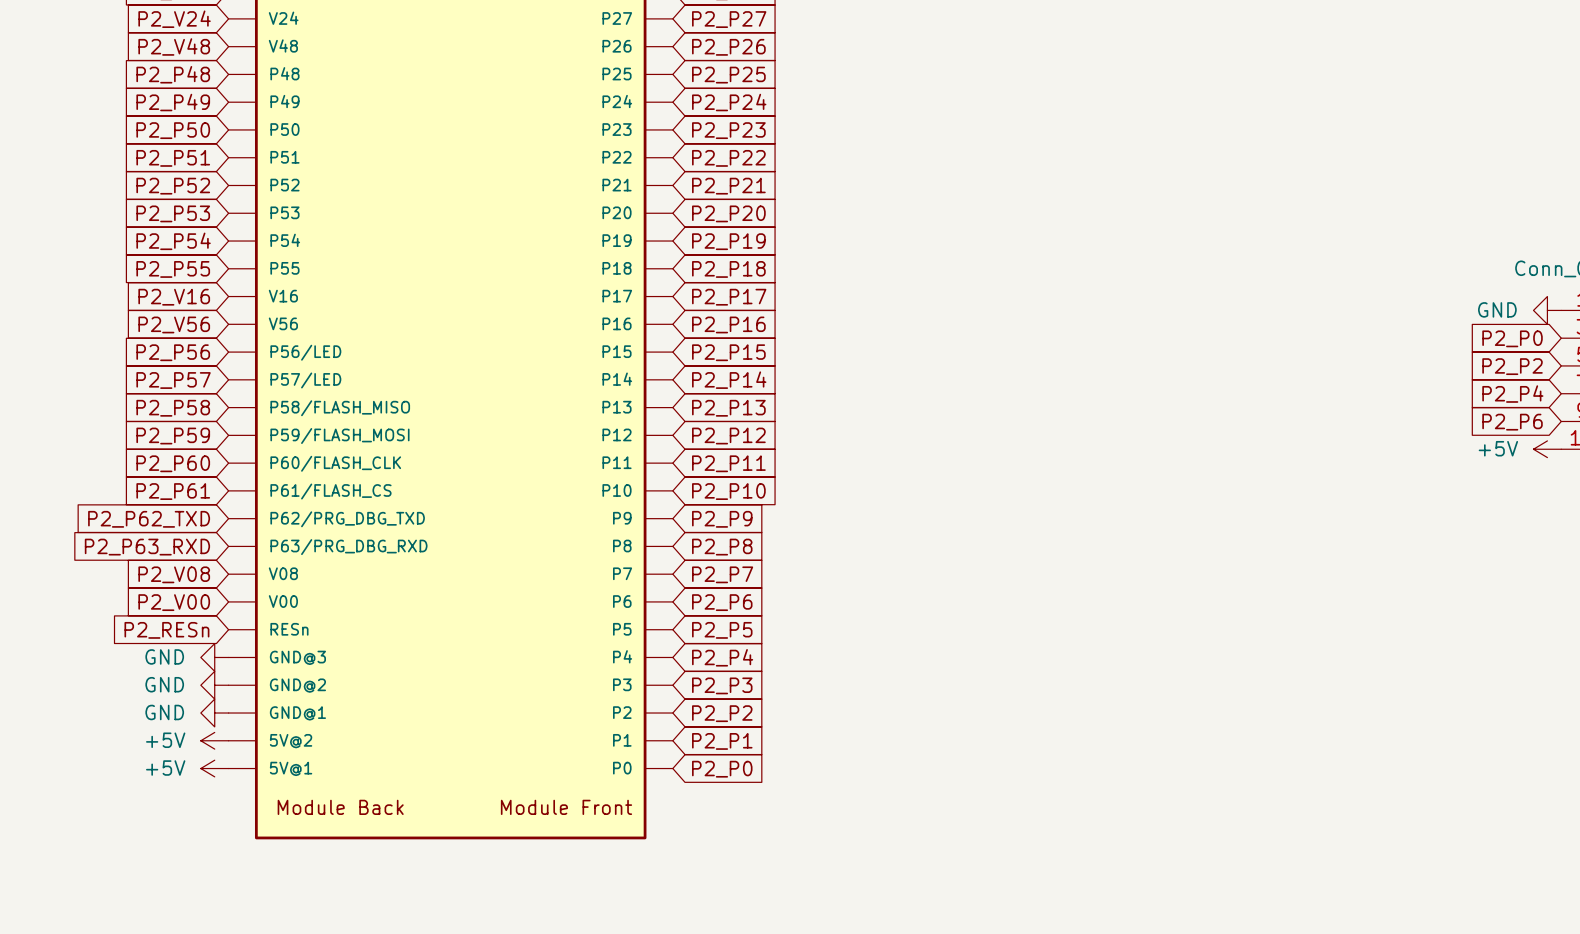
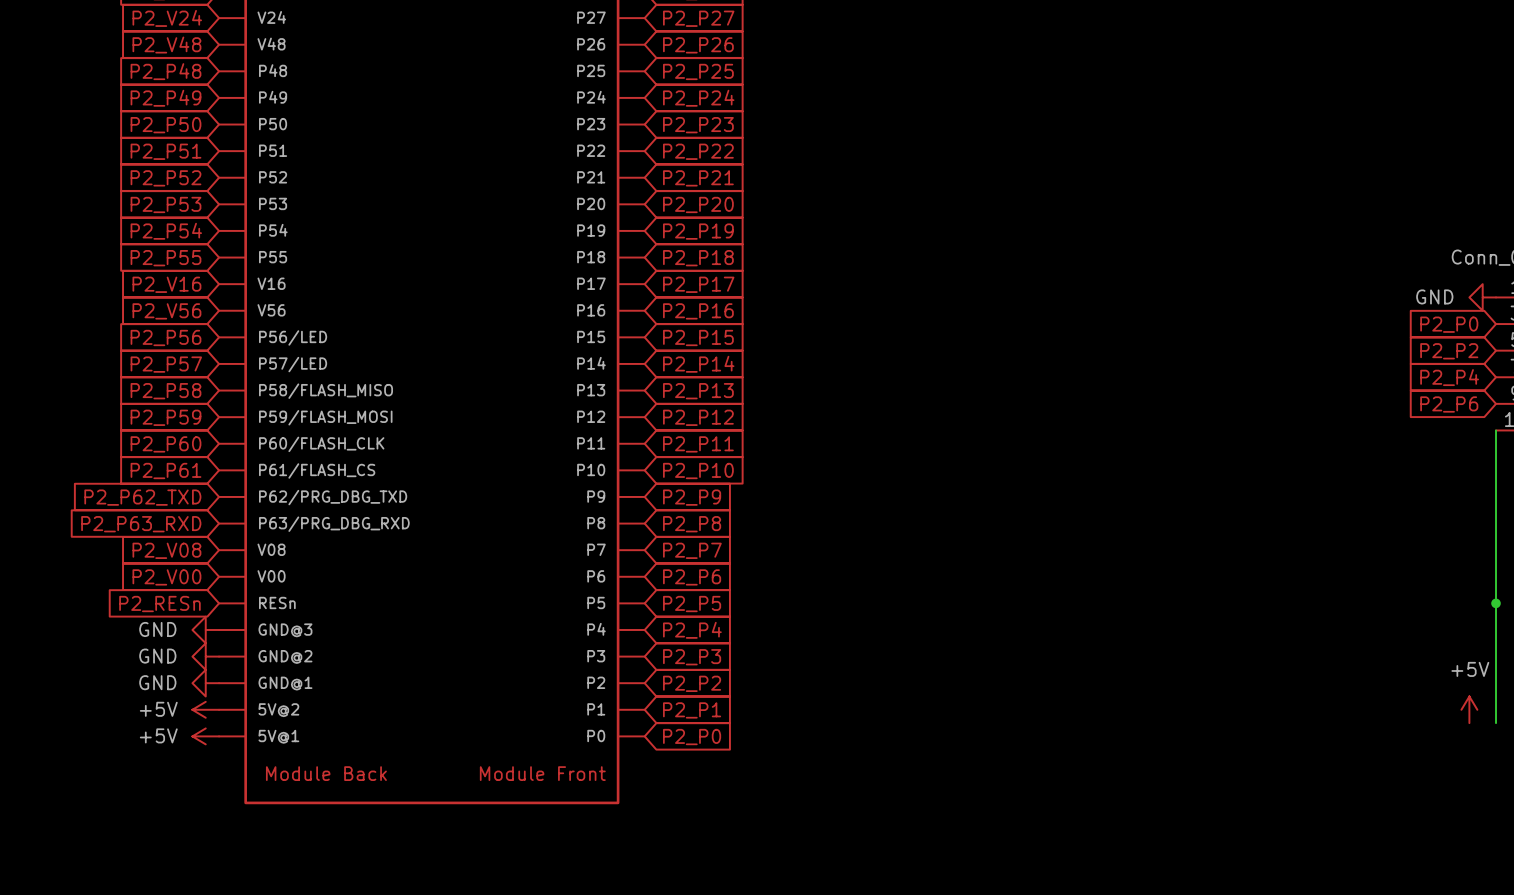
power symbol: +5V (1547, 449) -> none
wire: none -> (1496, 430) (1496, 723)
junction: none -> (1496, 603)
power symbol: none -> +5V (1469, 709)

